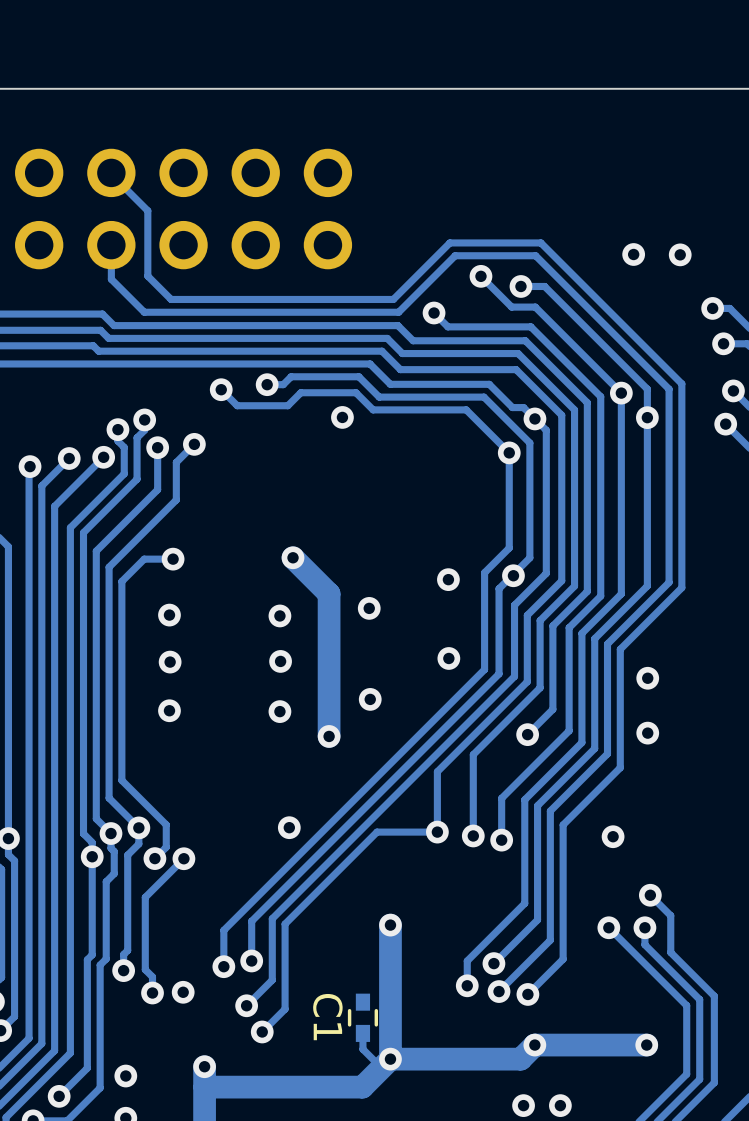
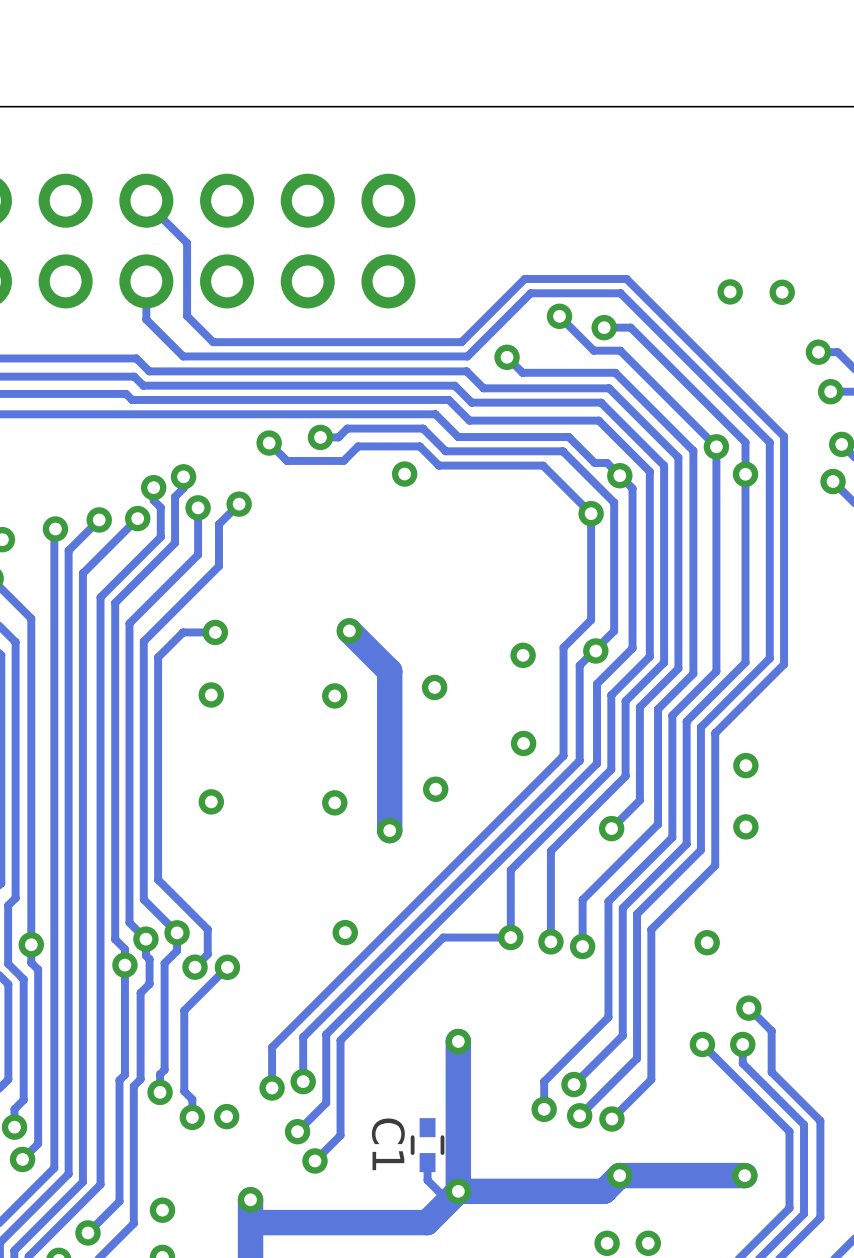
via: (280, 661) -> none
via: (170, 662) -> none

